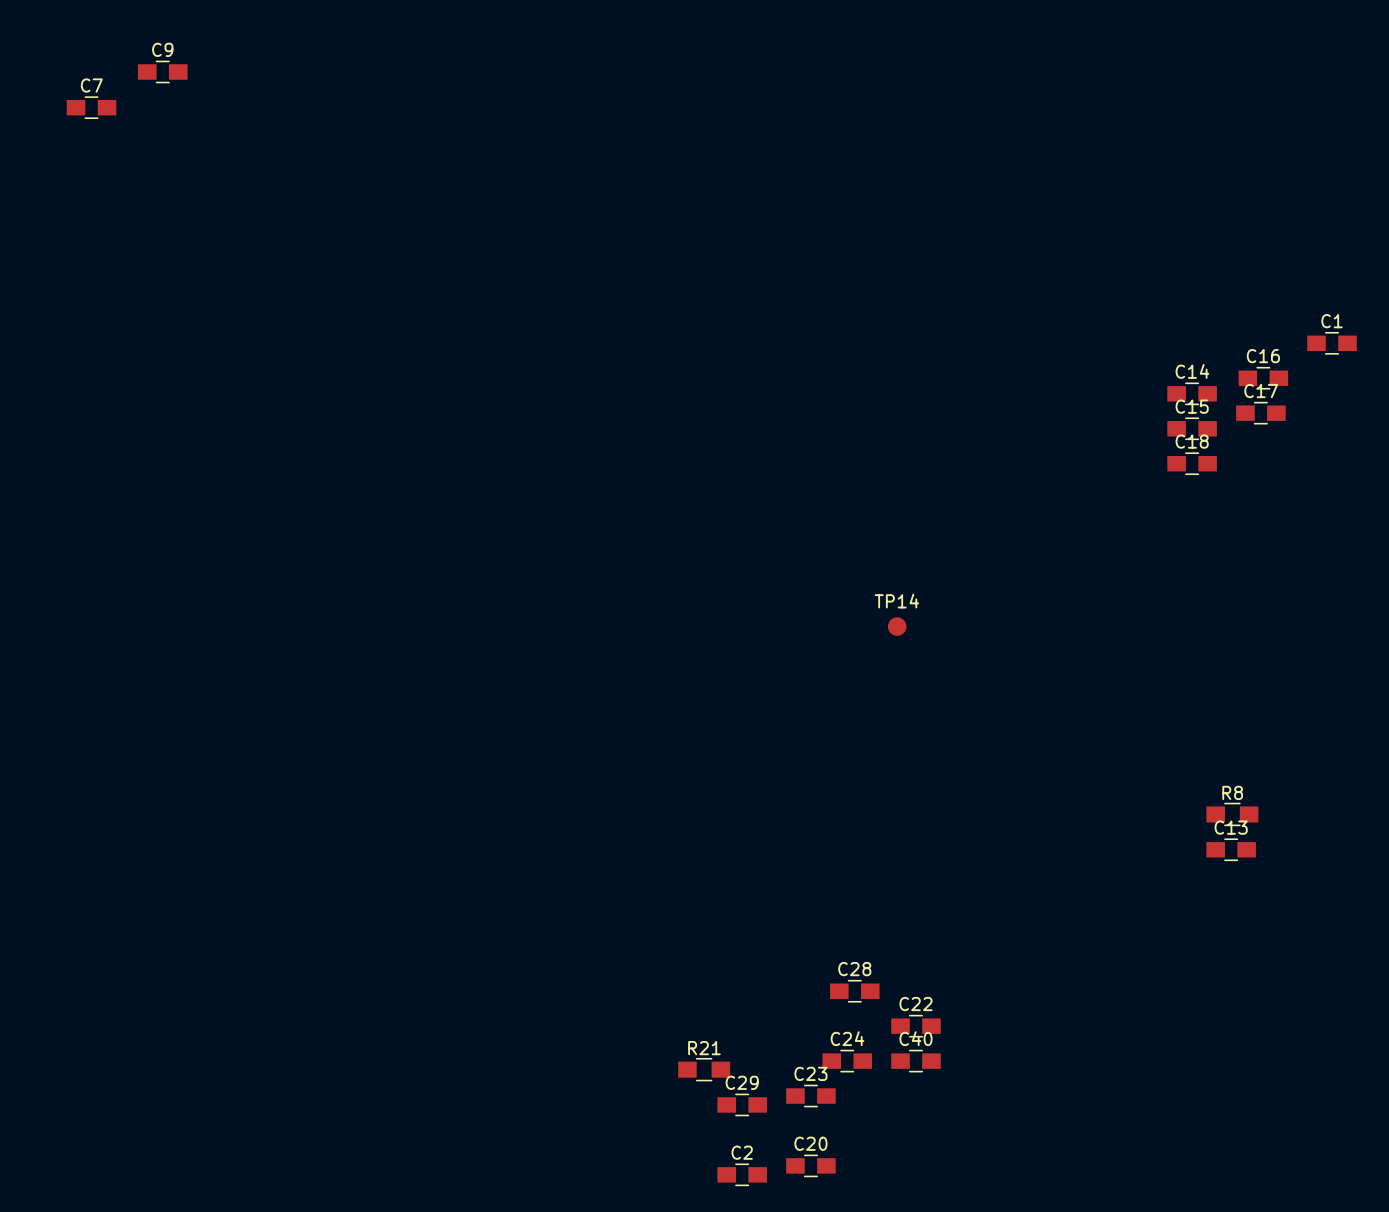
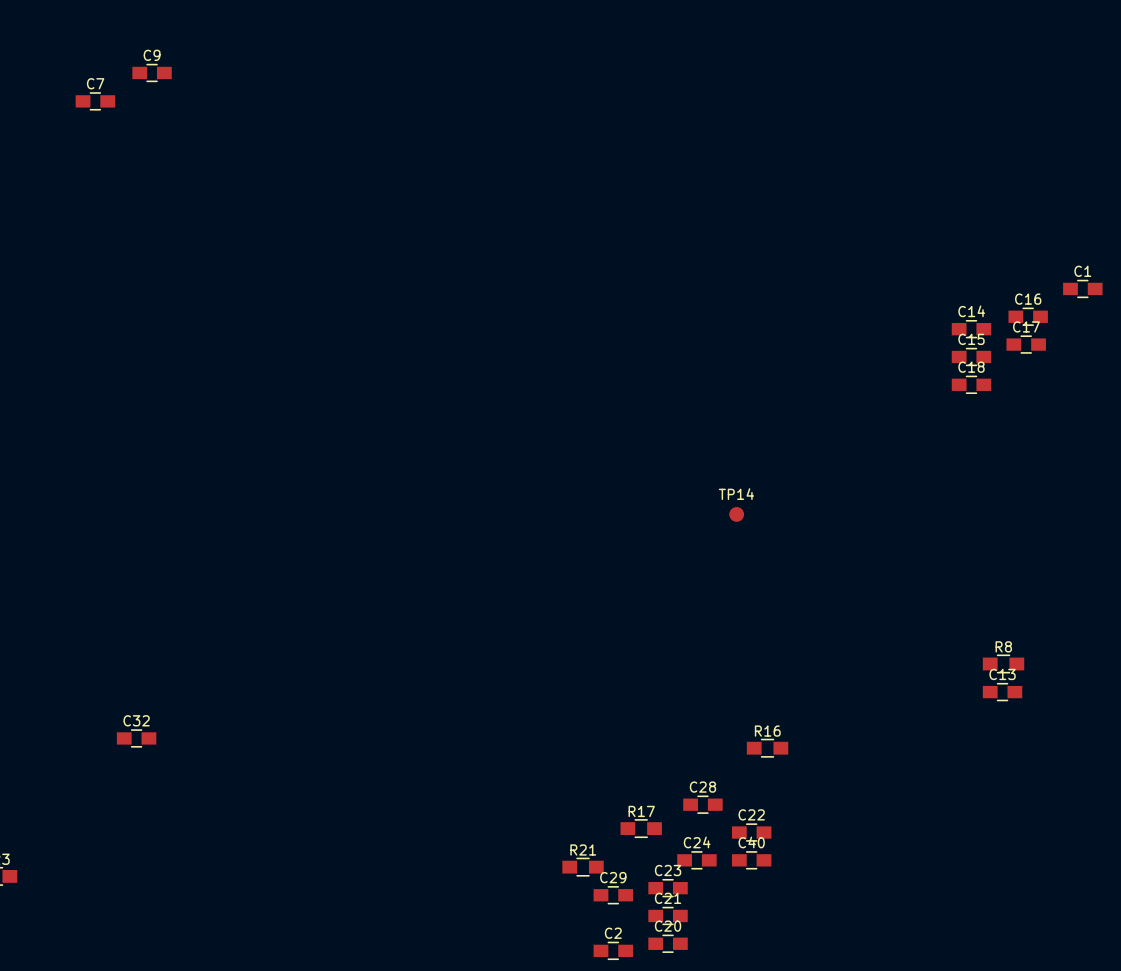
C32: none -> (136, 738)
R16: none -> (767, 748)
R17: none -> (641, 828)
C21: none -> (668, 915)

